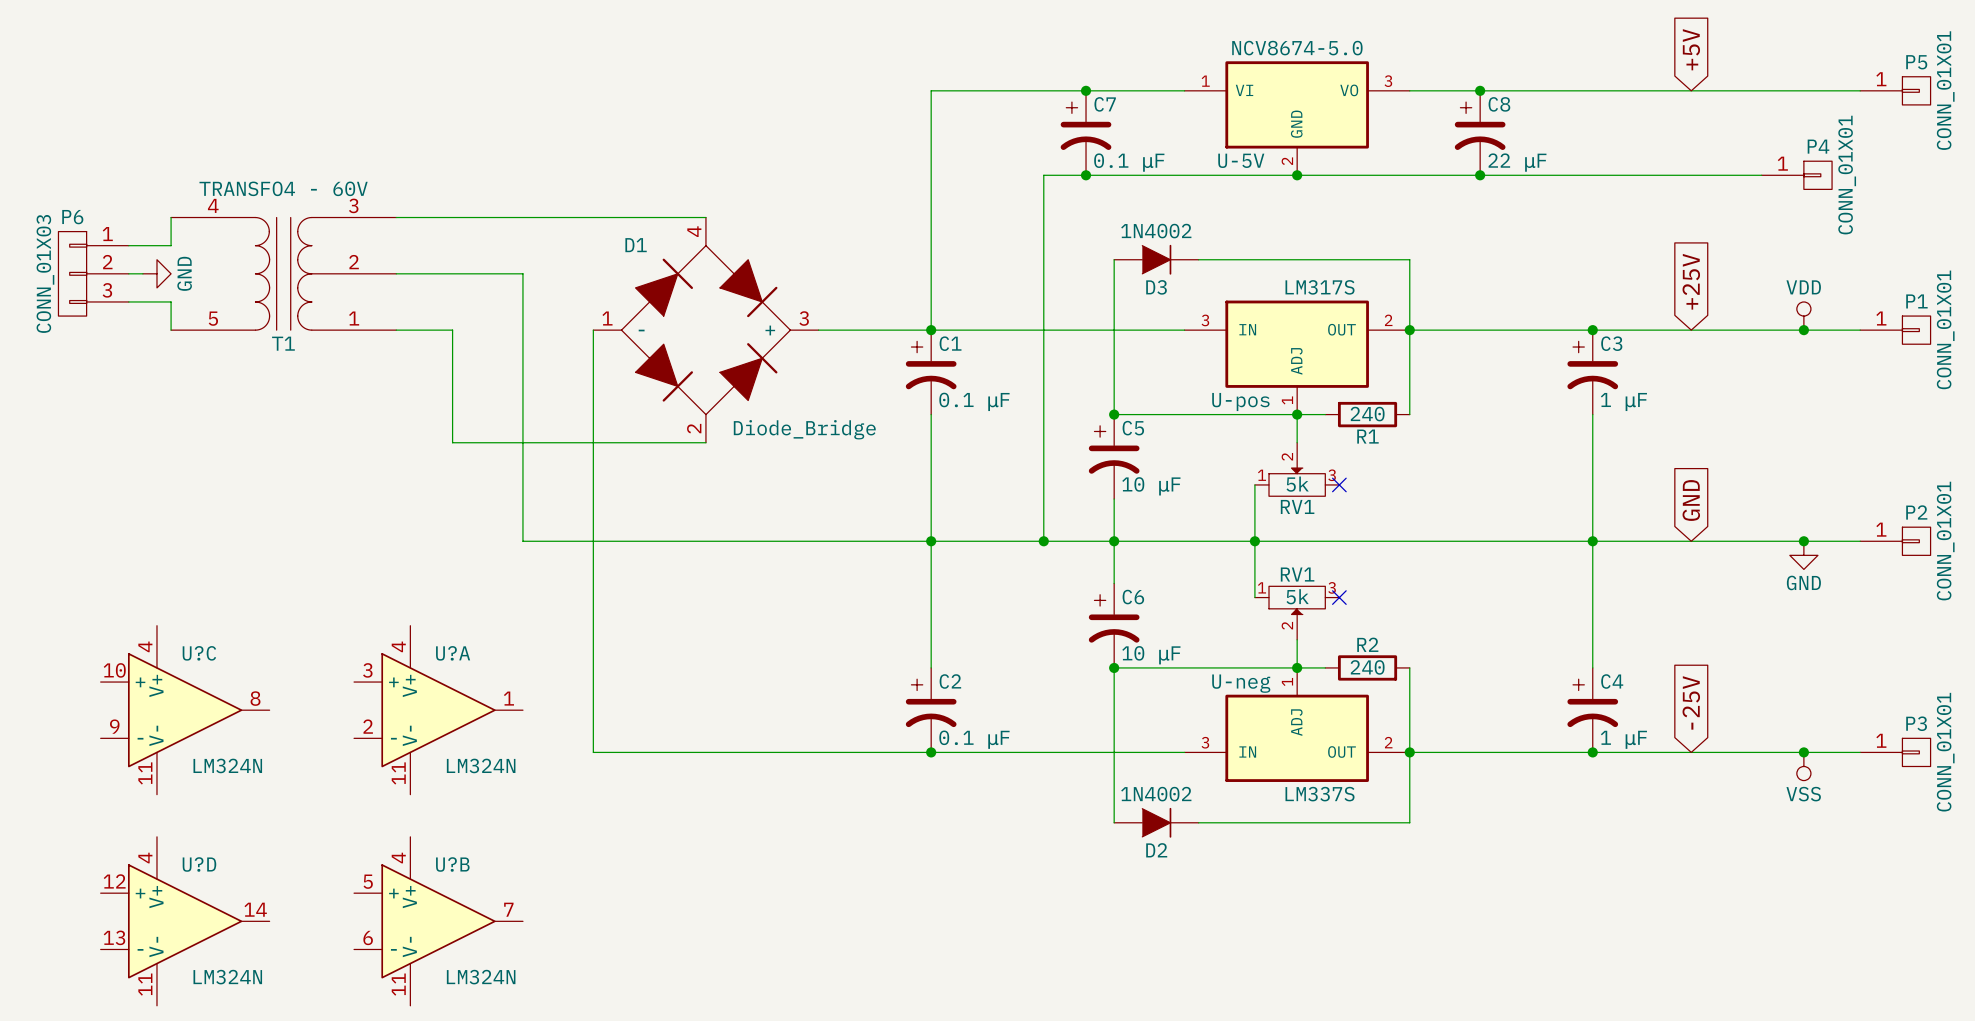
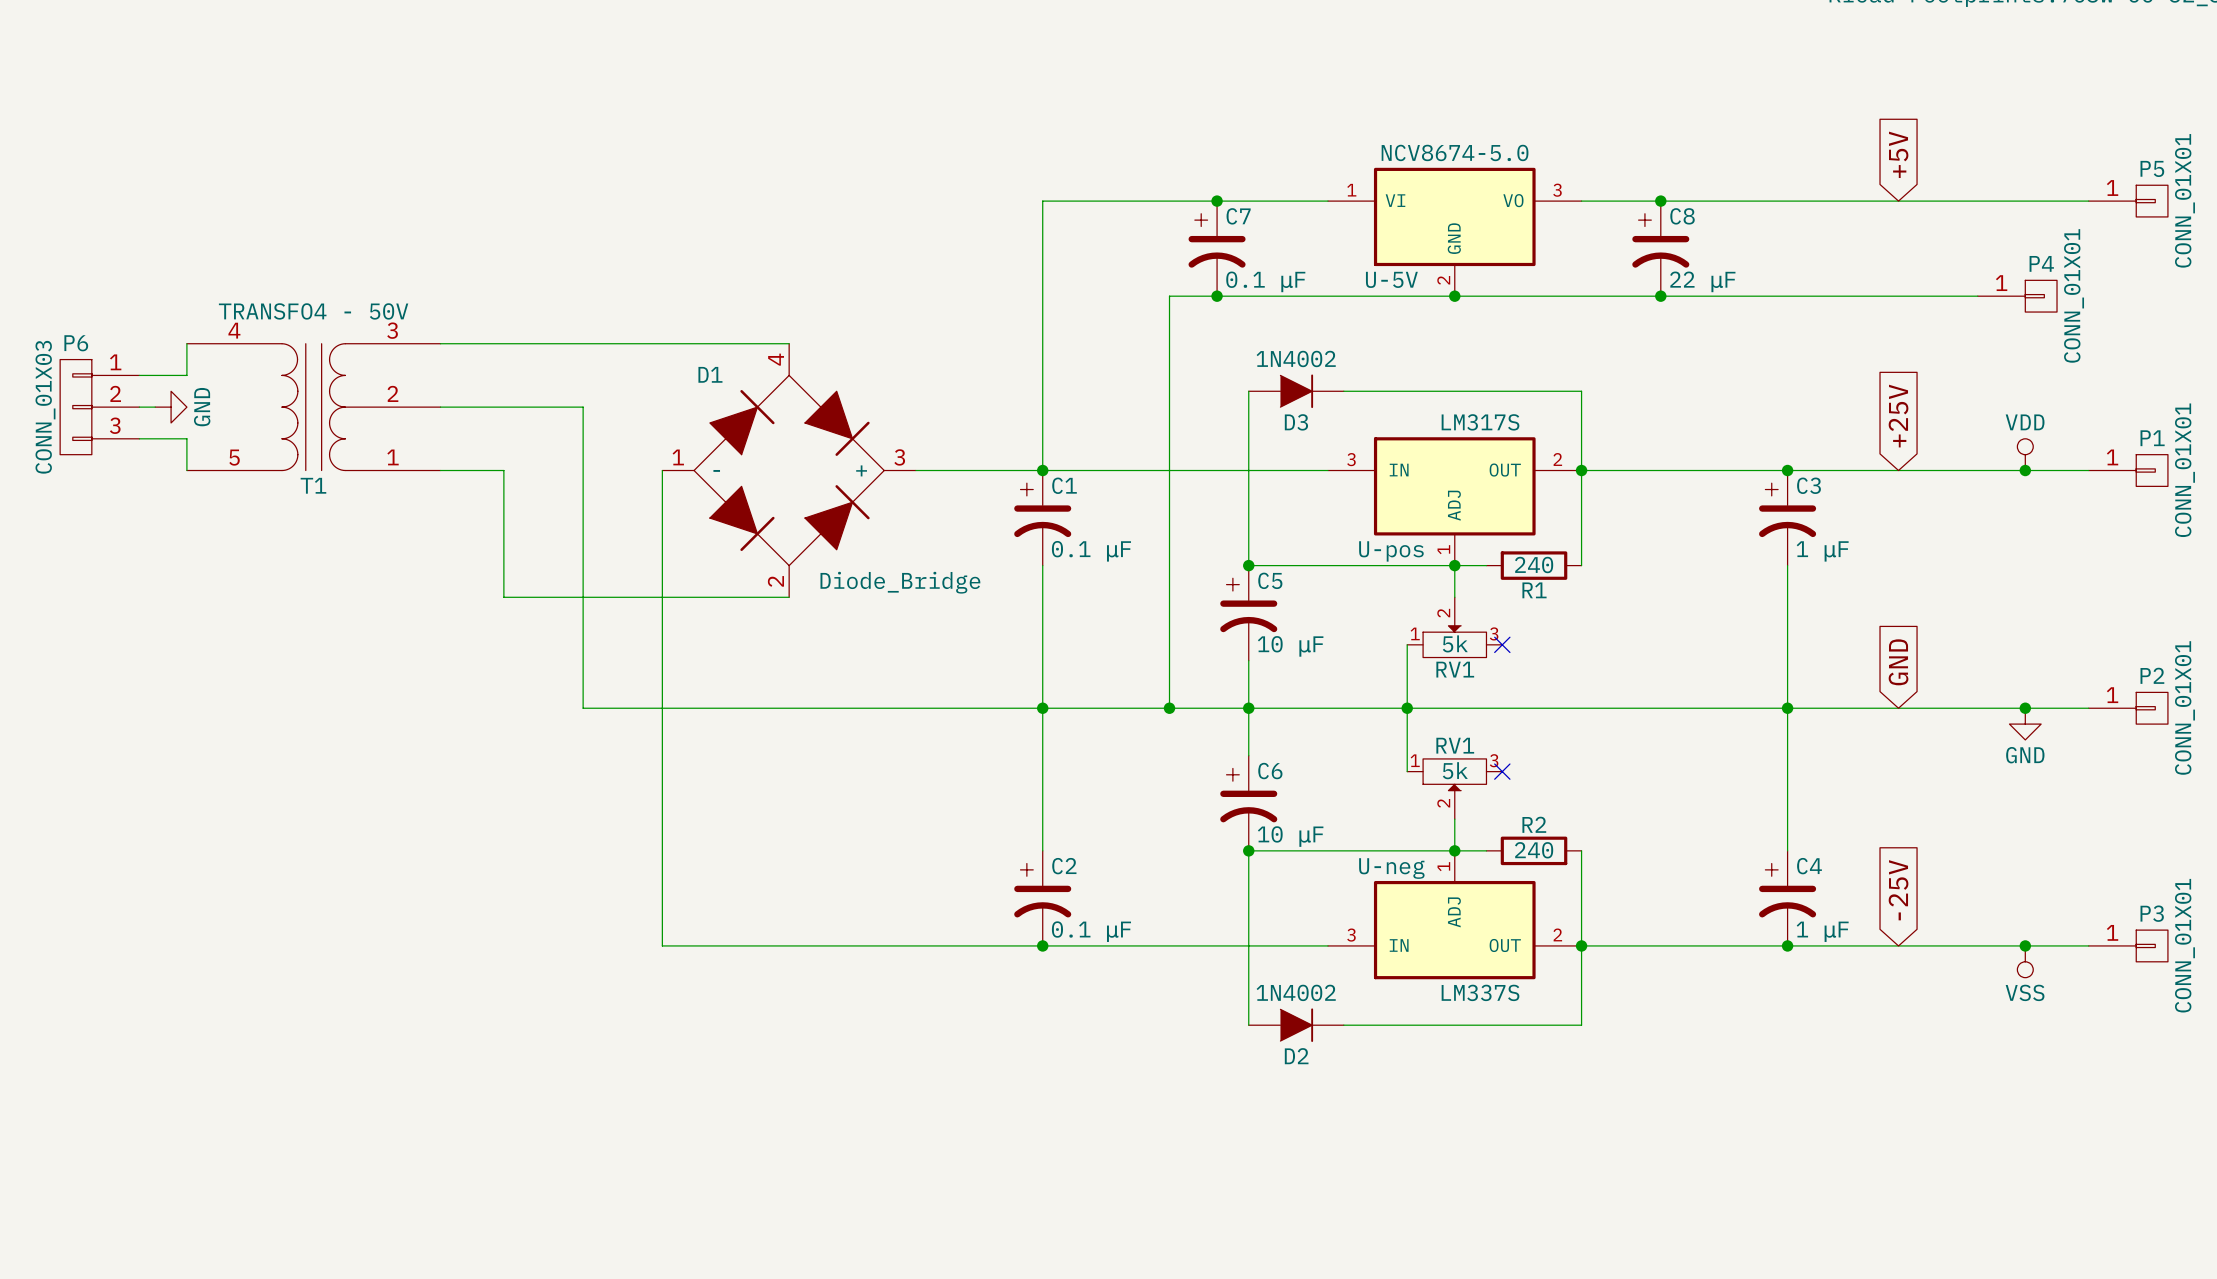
T1 value: TRANSFO4 - 60V (283, 188) -> TRANSFO4 - 50V (313, 311)
U?C: LM324N (185, 710) -> none
U?A: LM324N (438, 710) -> none
U?D: LM324N (185, 921) -> none
U?B: LM324N (438, 921) -> none

